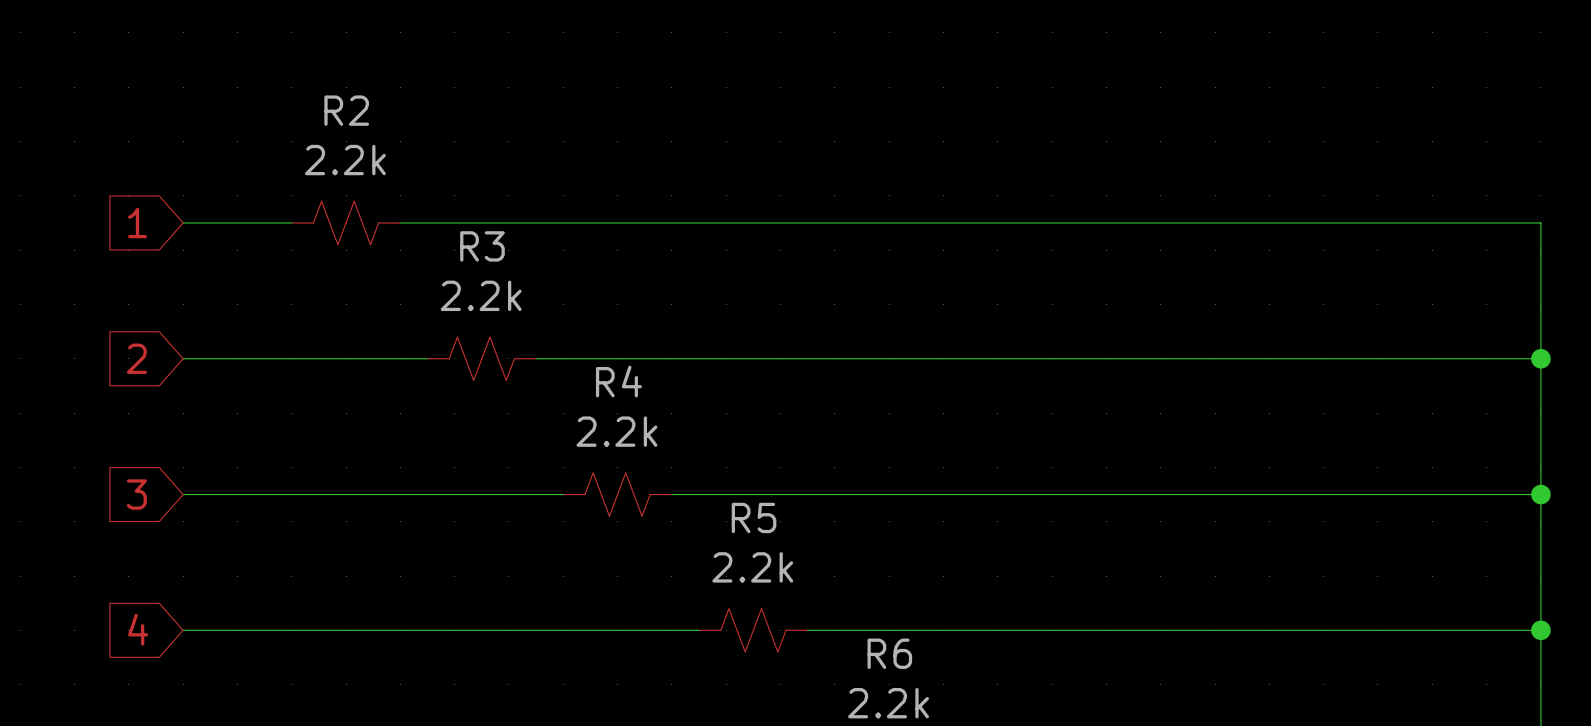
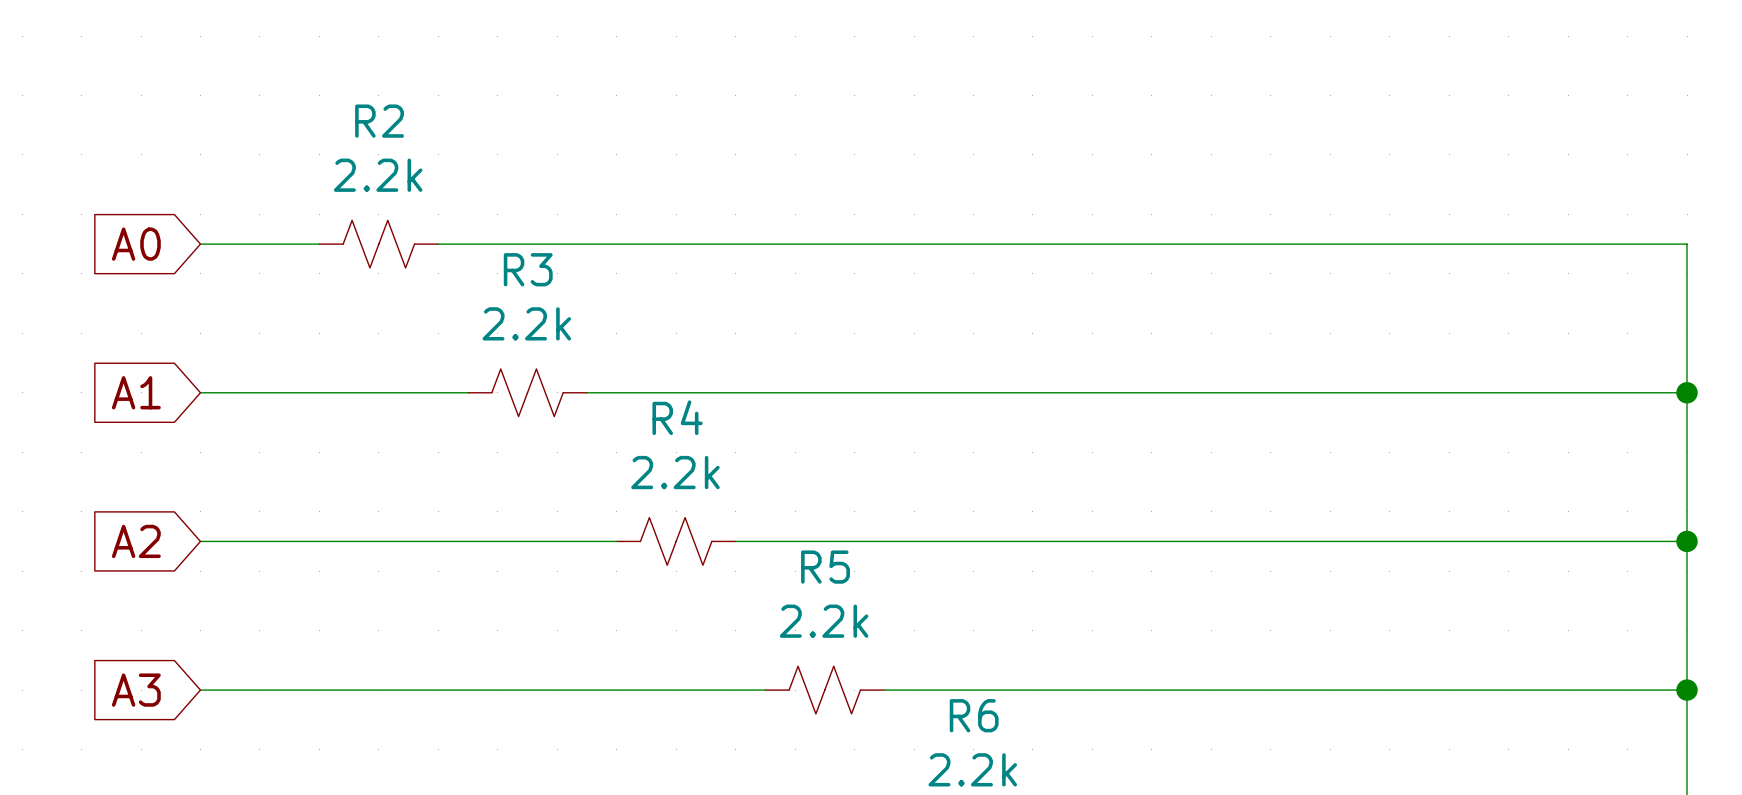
global label: 1 (137, 222) -> A0 (136, 244)
global label: 2 (136, 358) -> A1 (136, 392)
global label: 3 (136, 494) -> A2 (136, 541)
global label: 4 (138, 629) -> A3 (136, 690)

